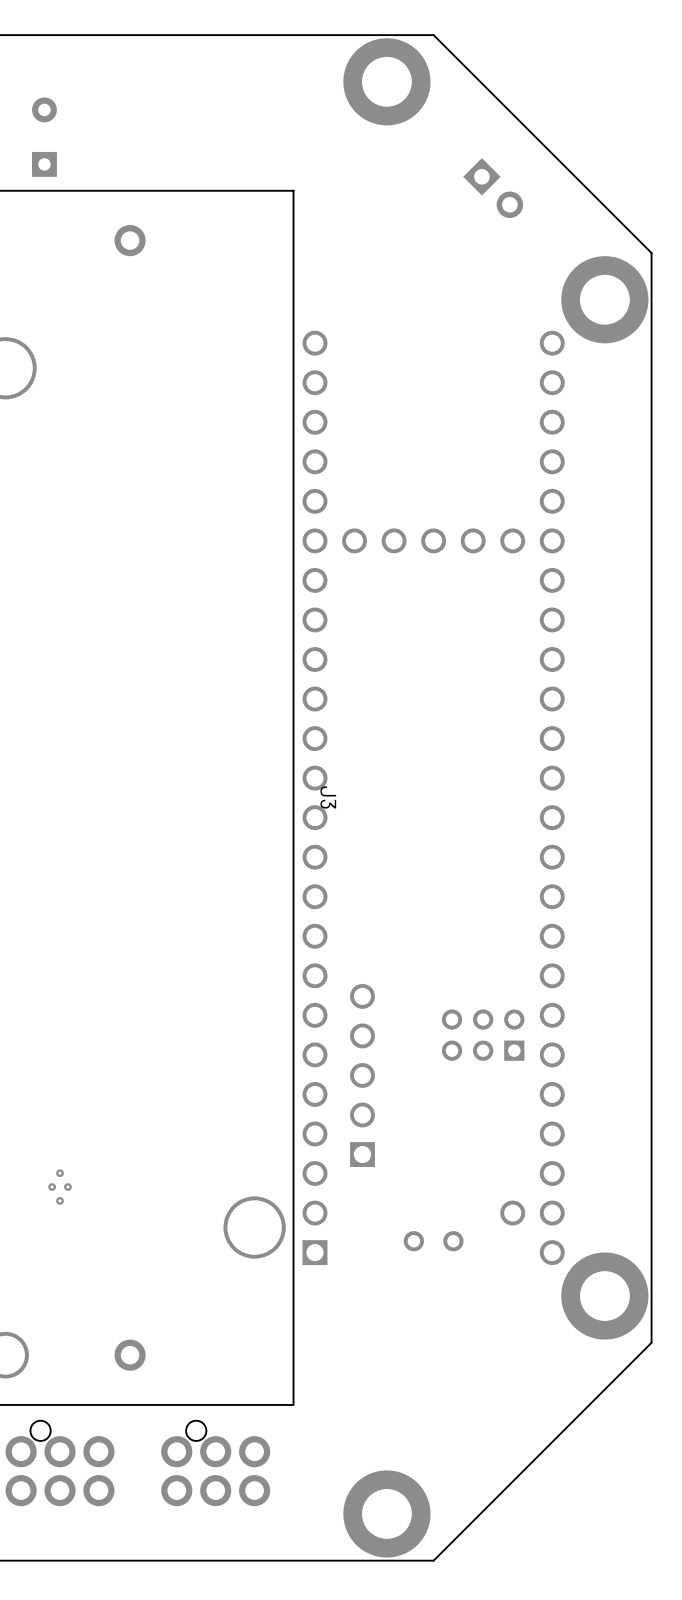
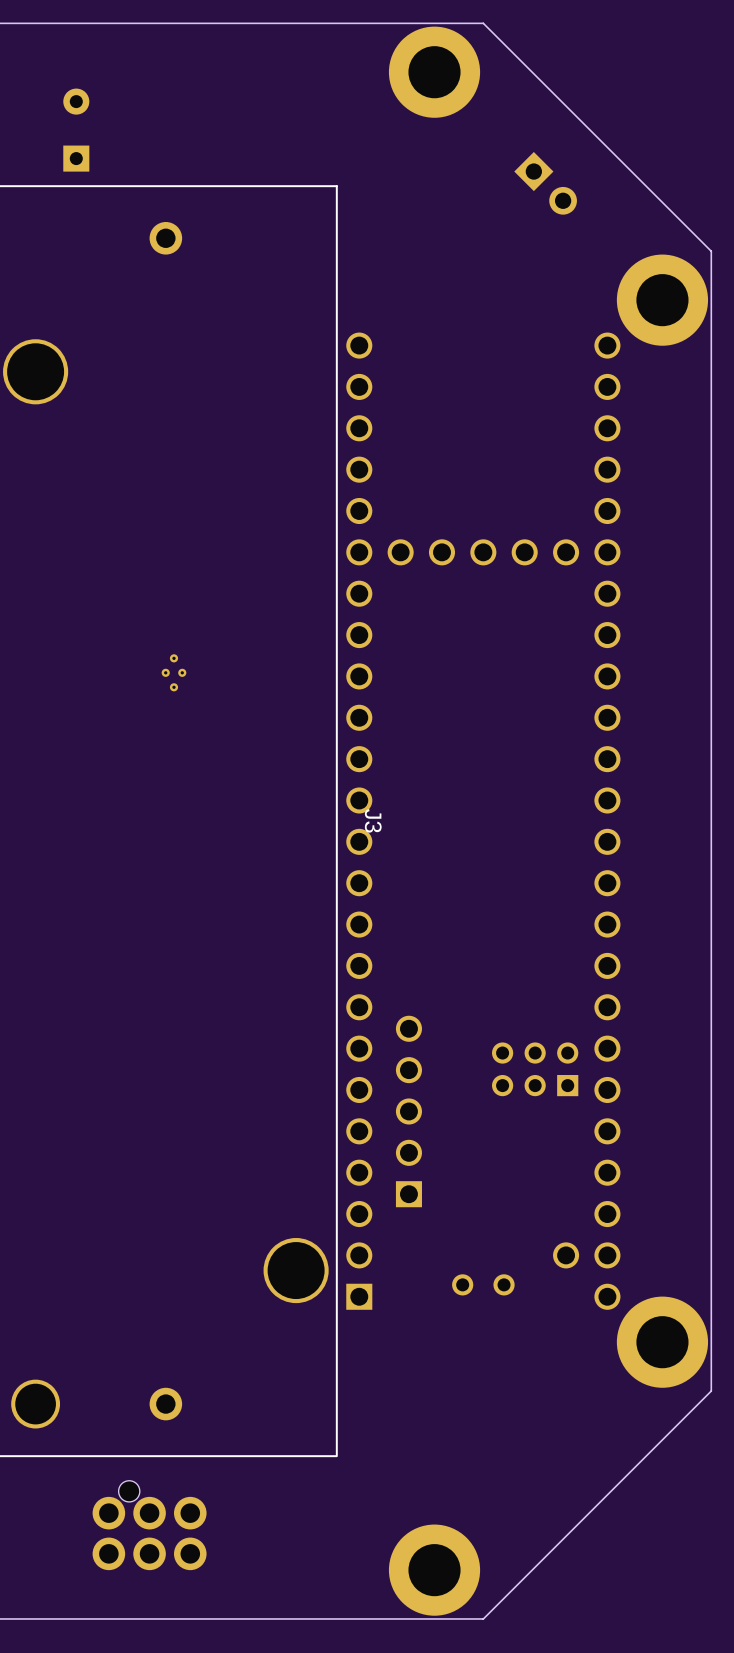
part: none -> (174, 672)
part: (60, 1187) -> none
part: (60, 1463) -> none
part: (215, 1463) -> none
part: none -> (149, 1525)

